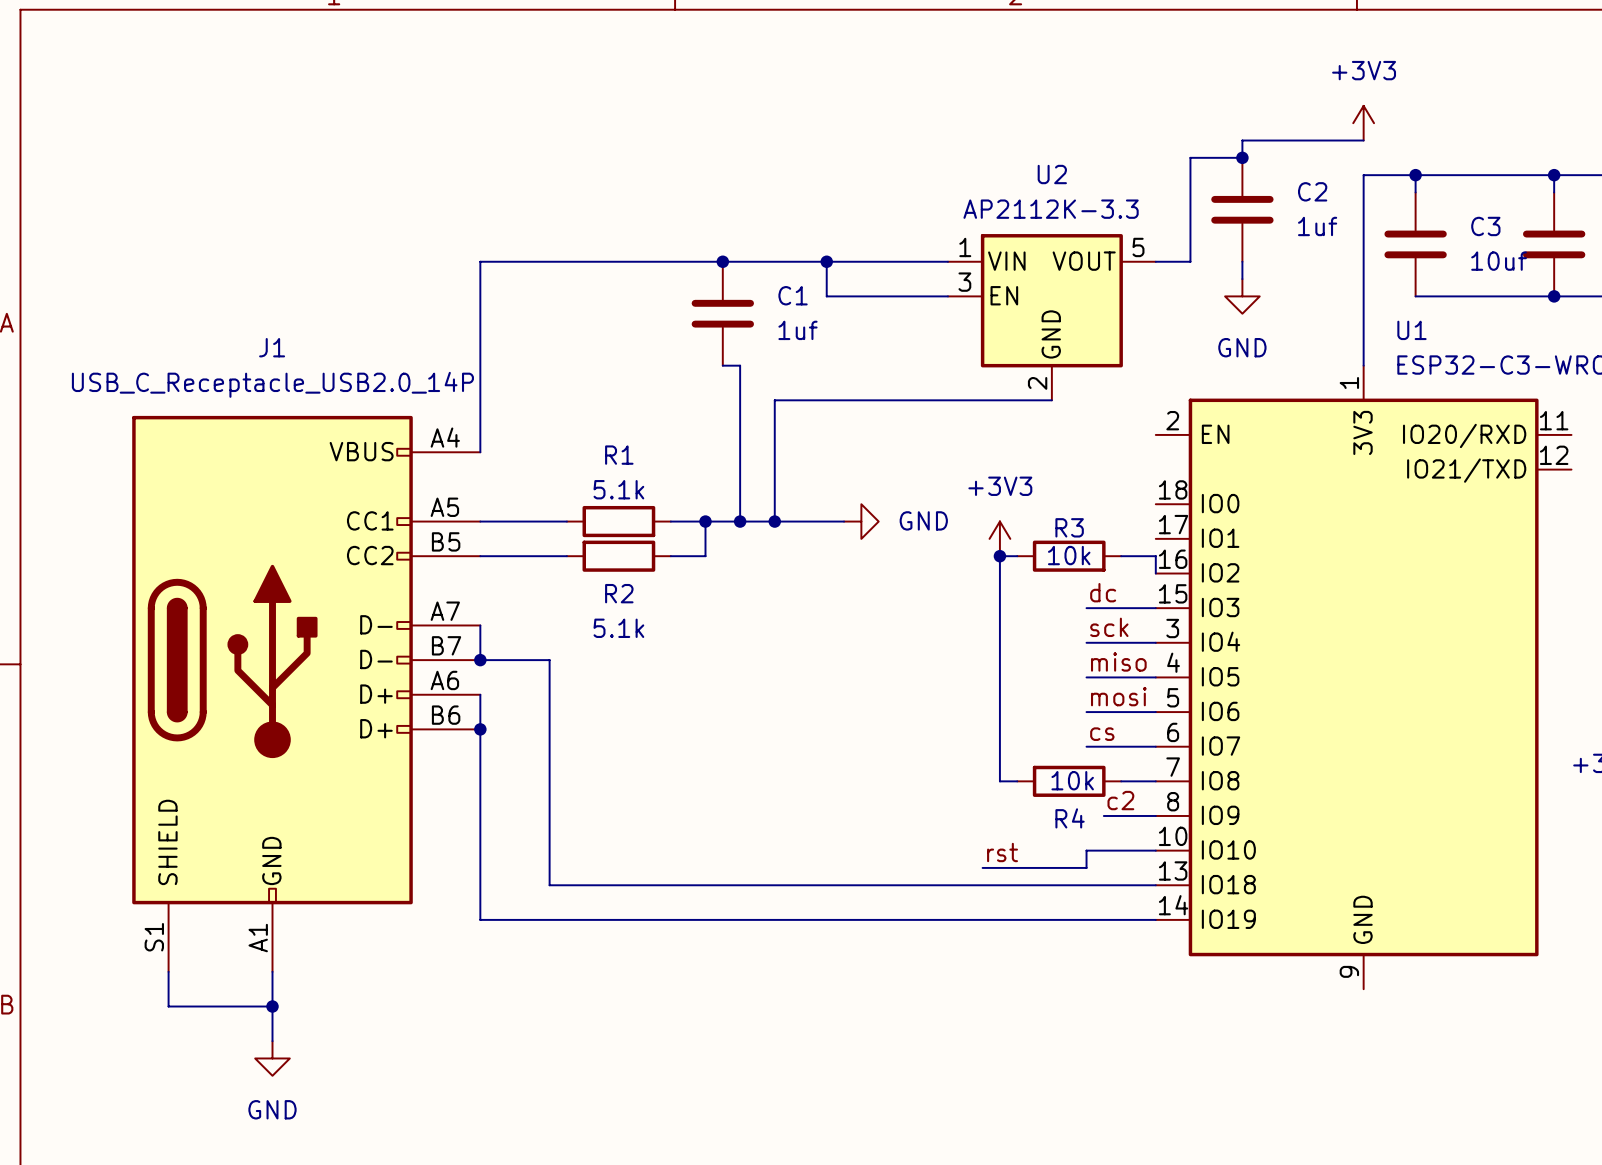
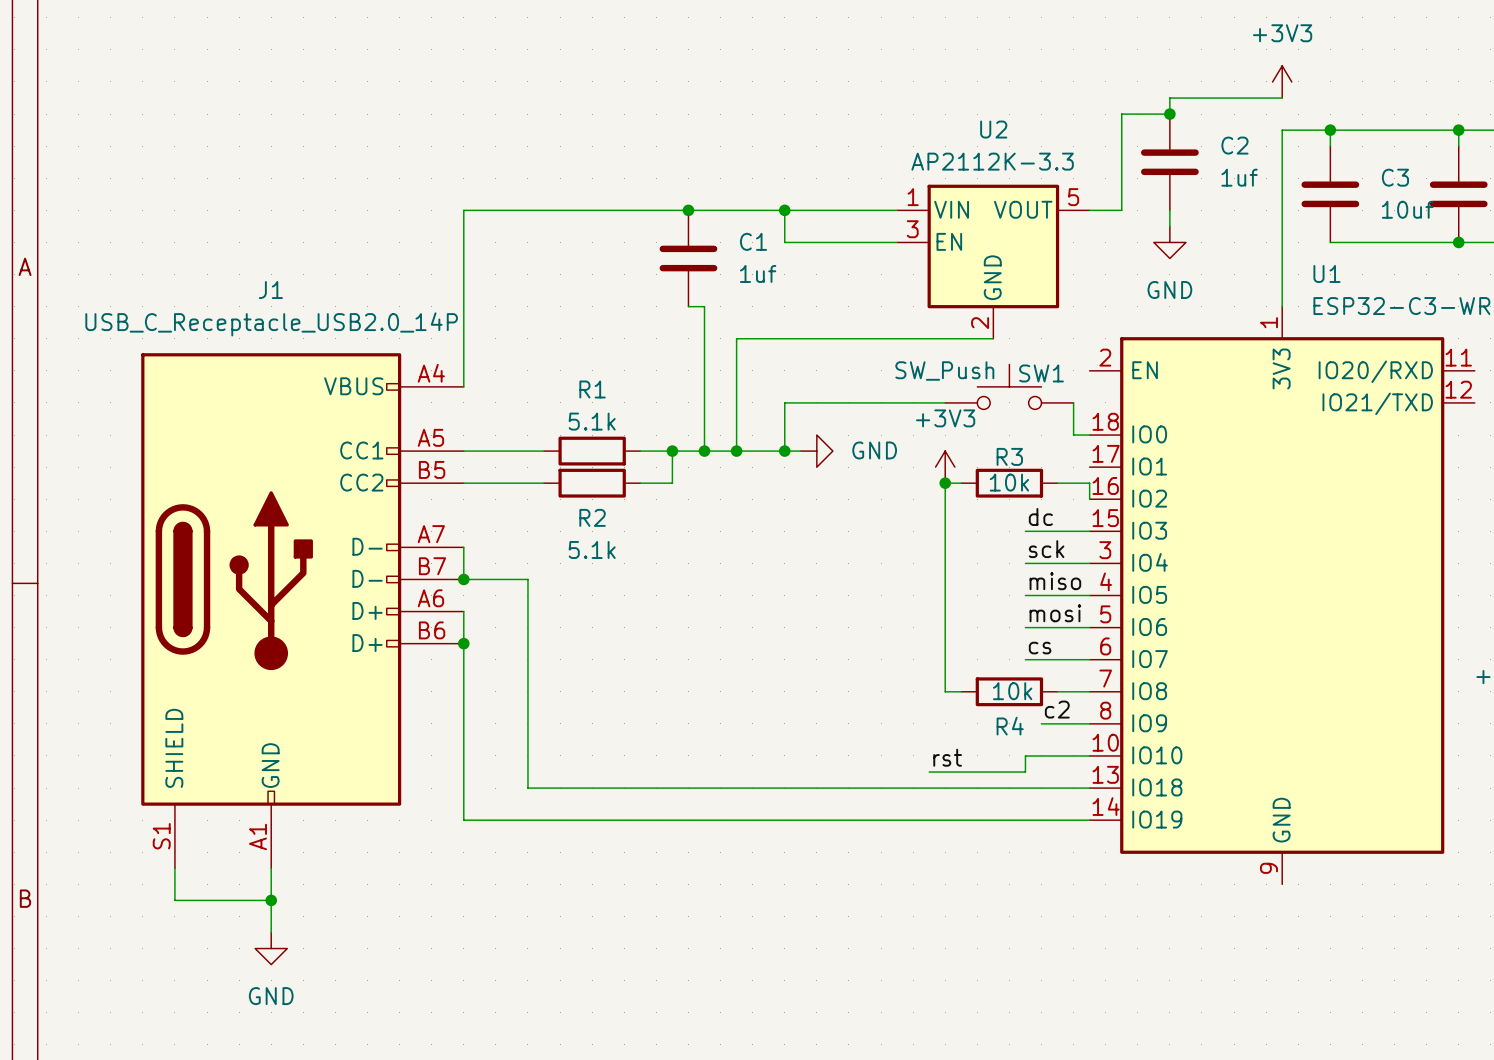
SW1: none -> SW_Push (1009, 386)
wire: none -> (945, 402) (784, 402) (784, 451)
wire: none -> (1073, 402) (1073, 435) (1089, 435)
junction: none -> (784, 451)

